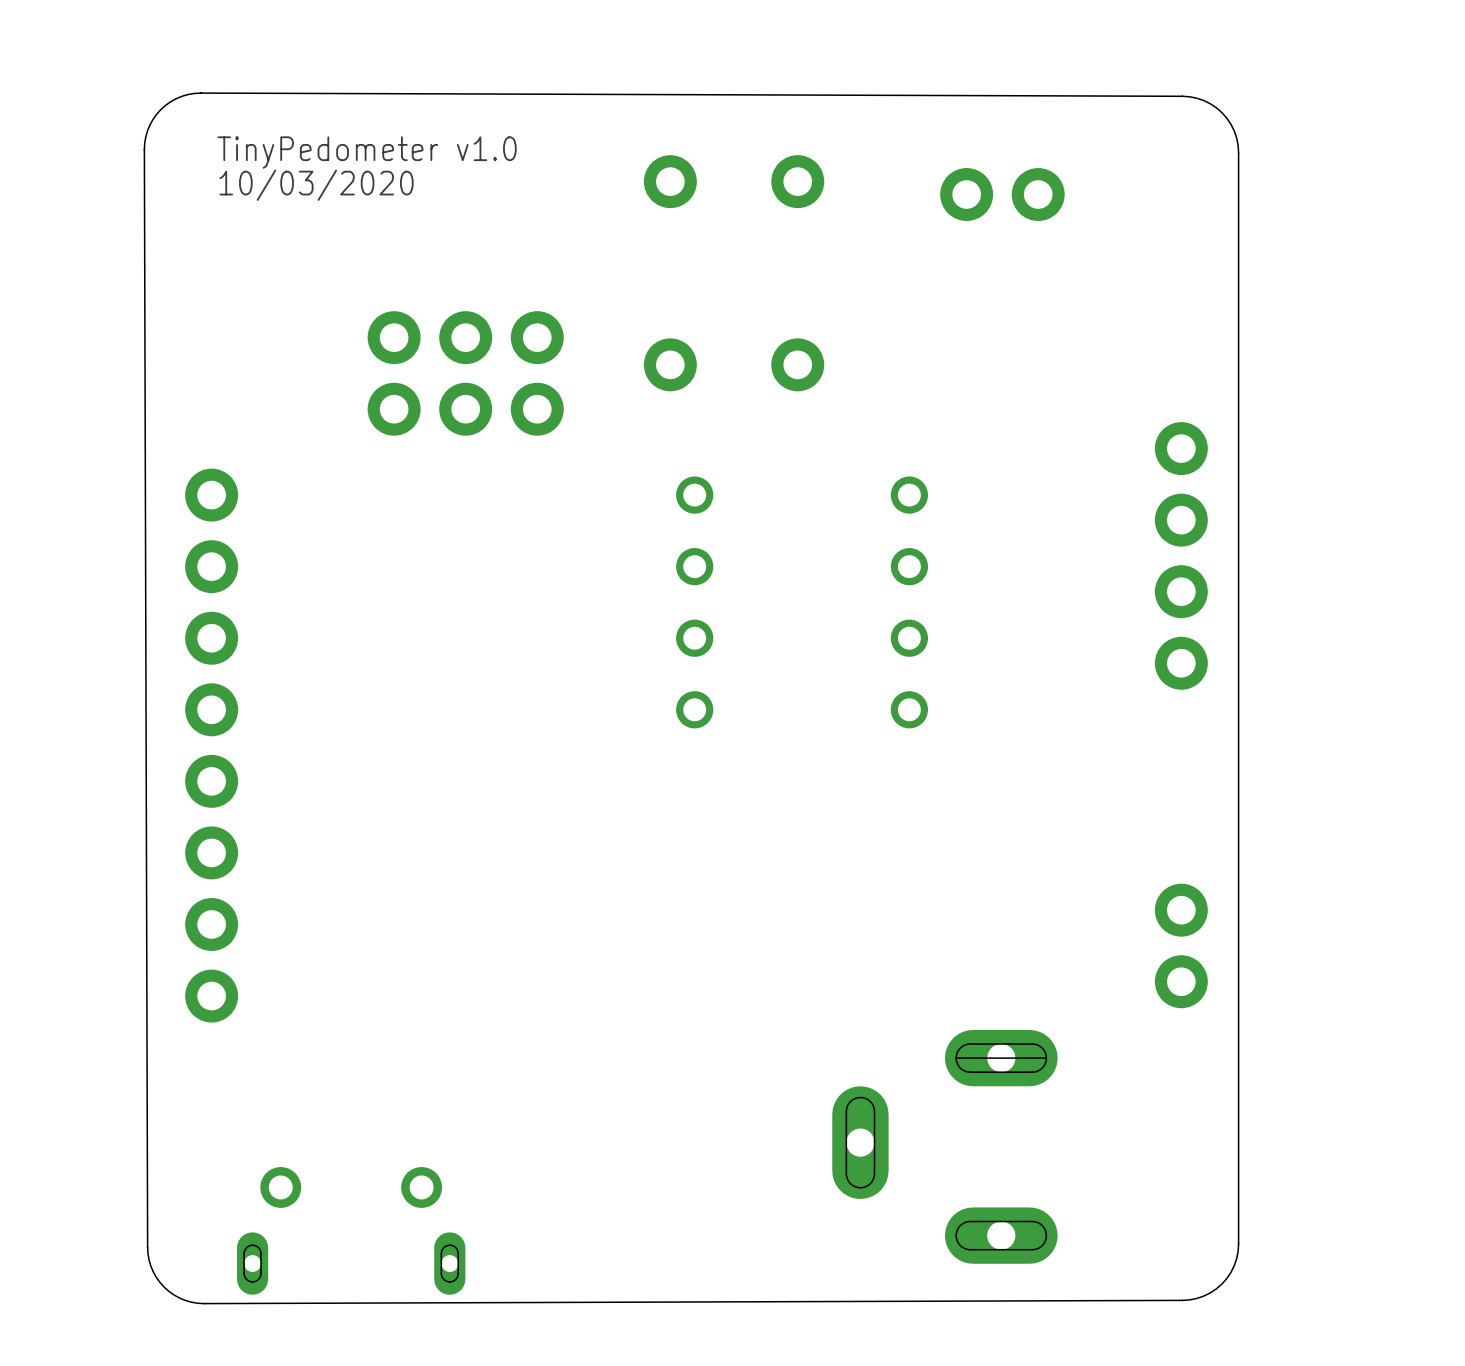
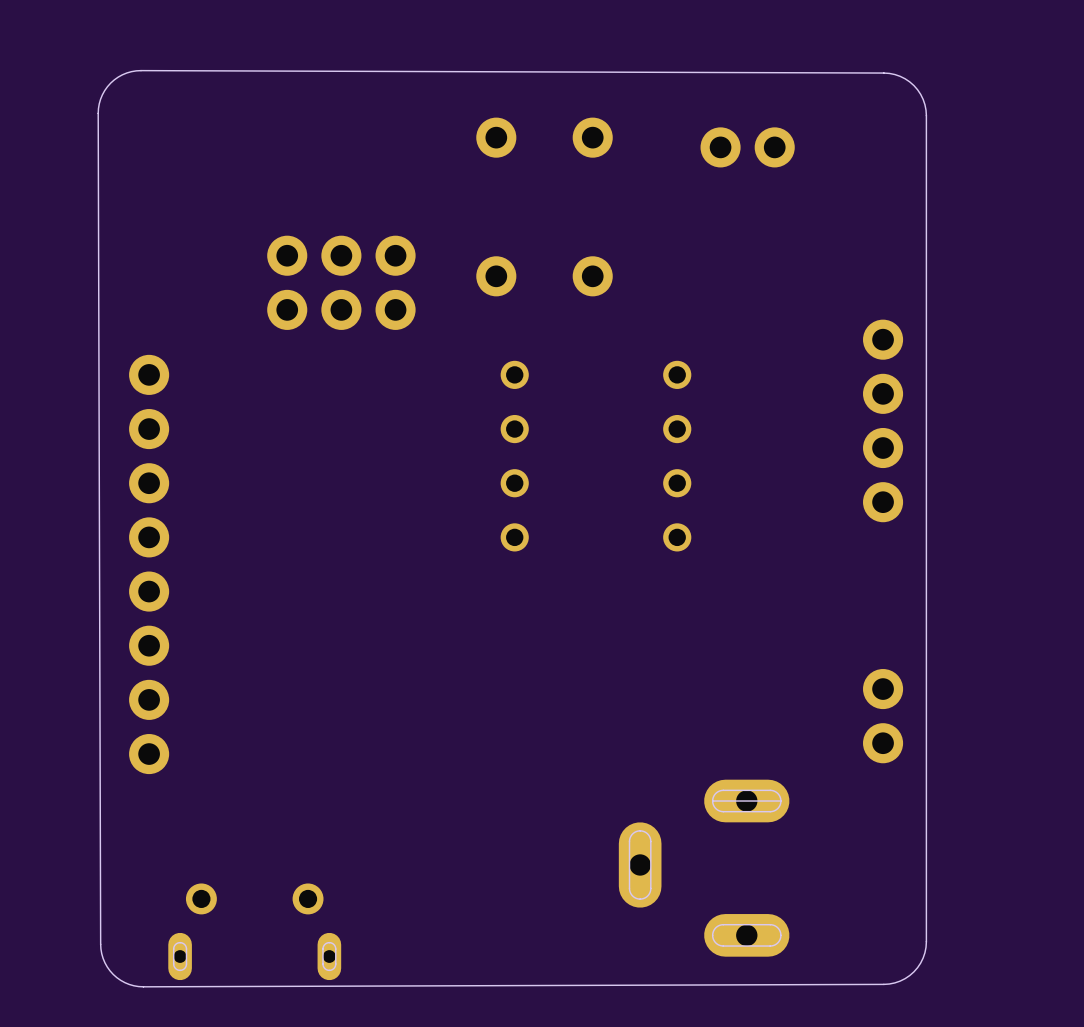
text: TinyPedometer v1.0 (367, 152) -> none
text: 10/03/2020 (316, 185) -> none

